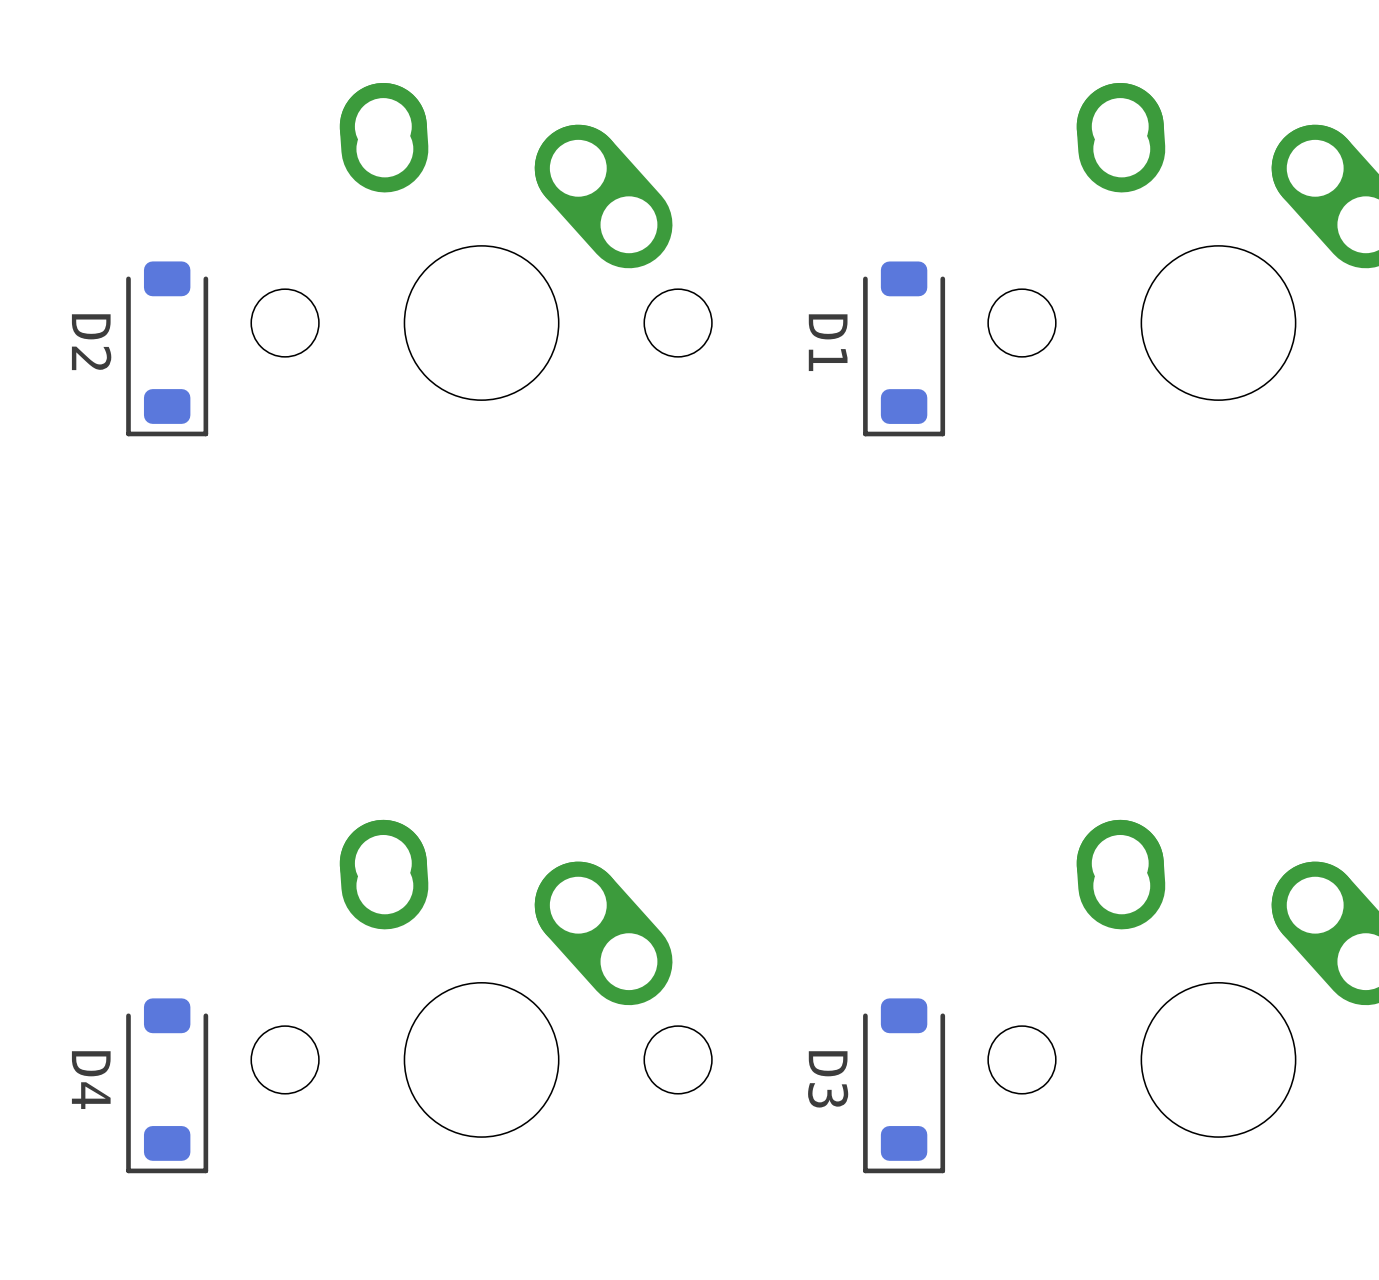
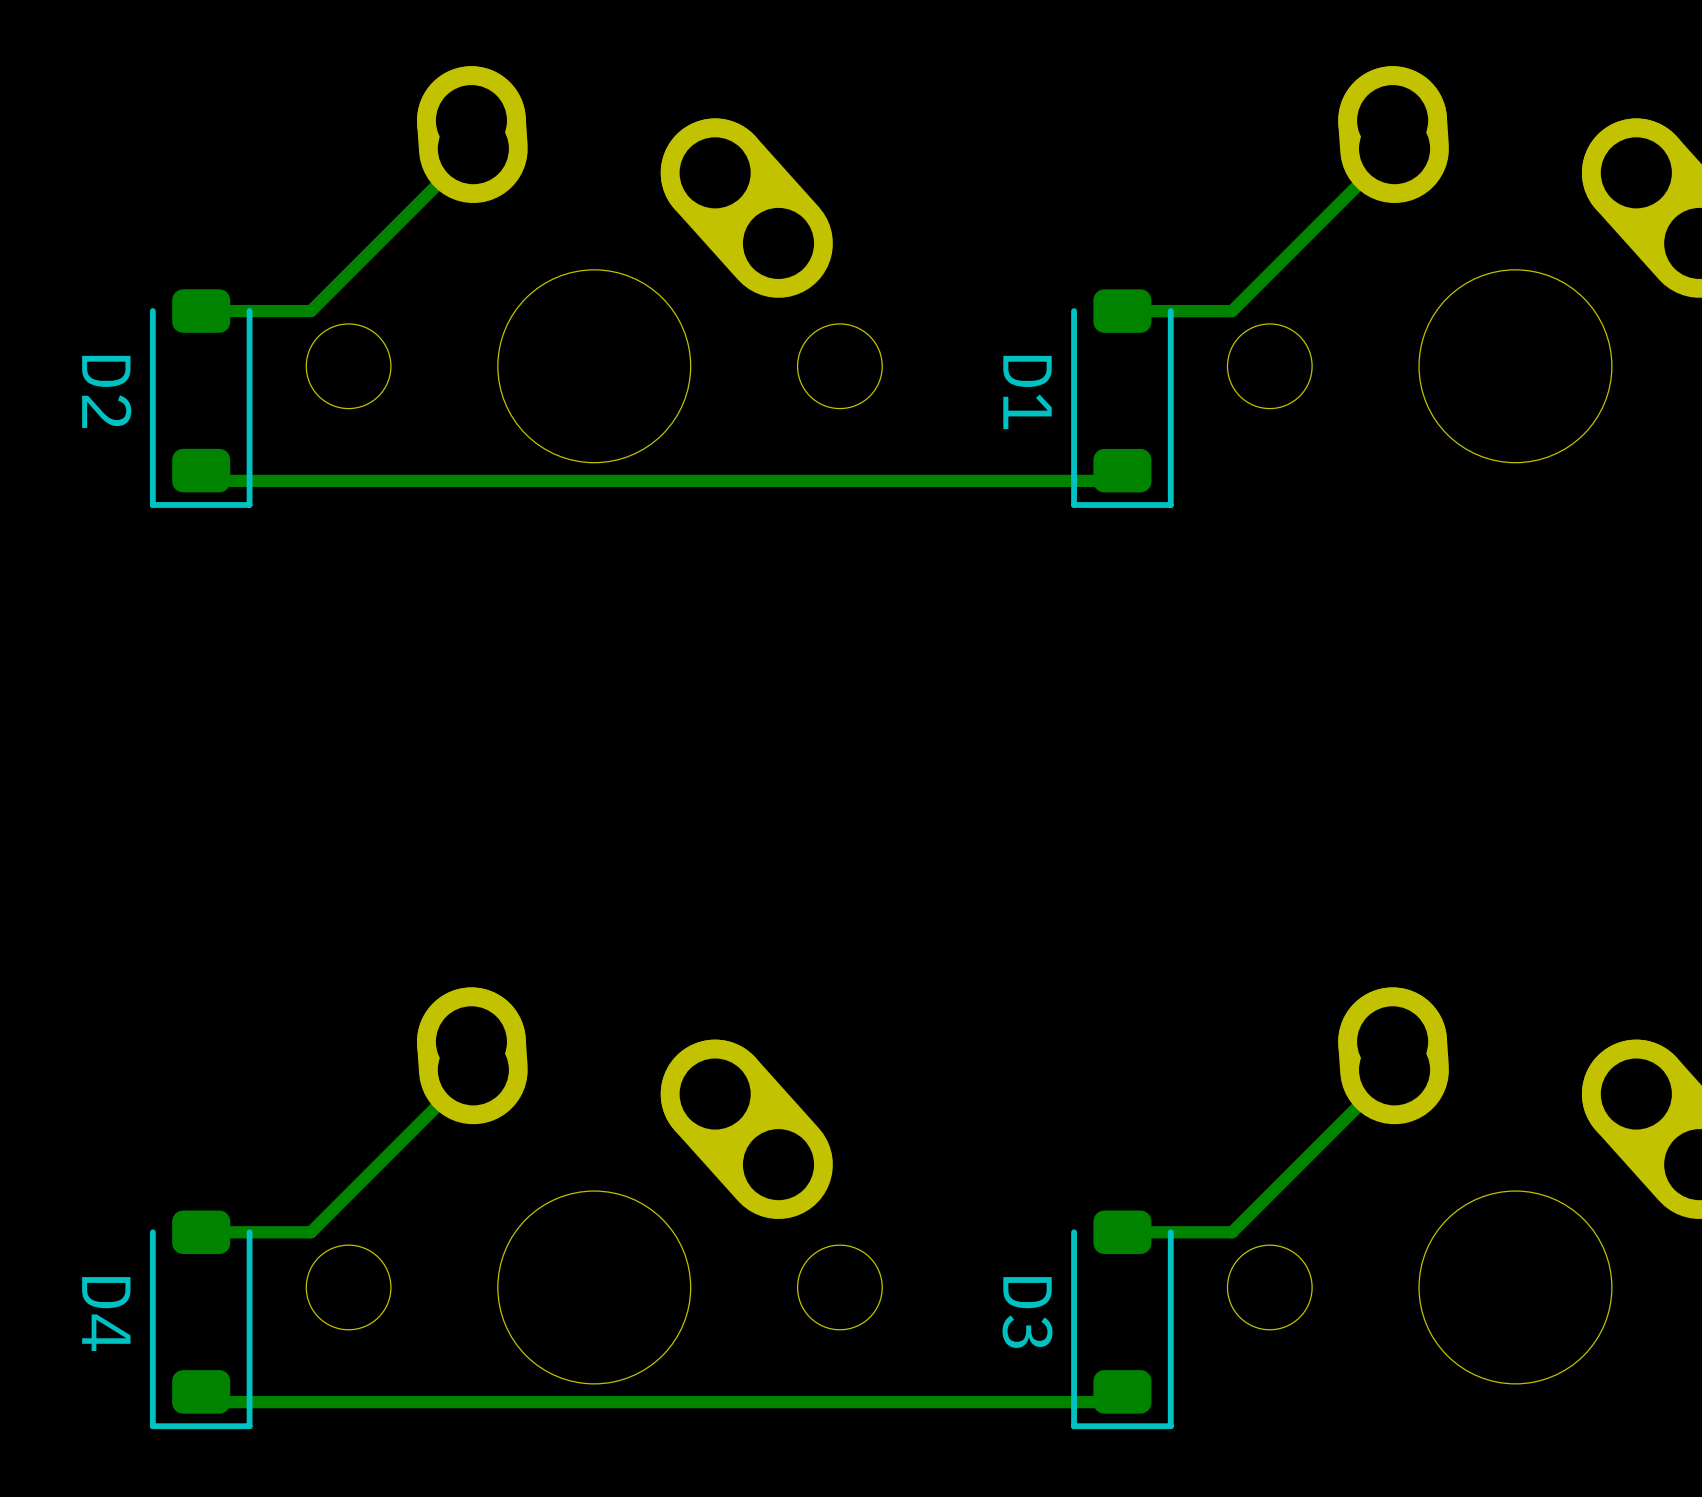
bottom track: none -> (473, 148) (310, 311) (201, 311)
bottom track: none -> (1394, 148) (1232, 311) (1122, 311)
bottom track: none -> (1122, 470) (1112, 480) (211, 480) (201, 470)
bottom track: none -> (473, 1069) (310, 1232) (201, 1232)
bottom track: none -> (1394, 1069) (1232, 1232) (1122, 1232)
bottom track: none -> (1122, 1391) (1112, 1402) (211, 1402) (201, 1391)

